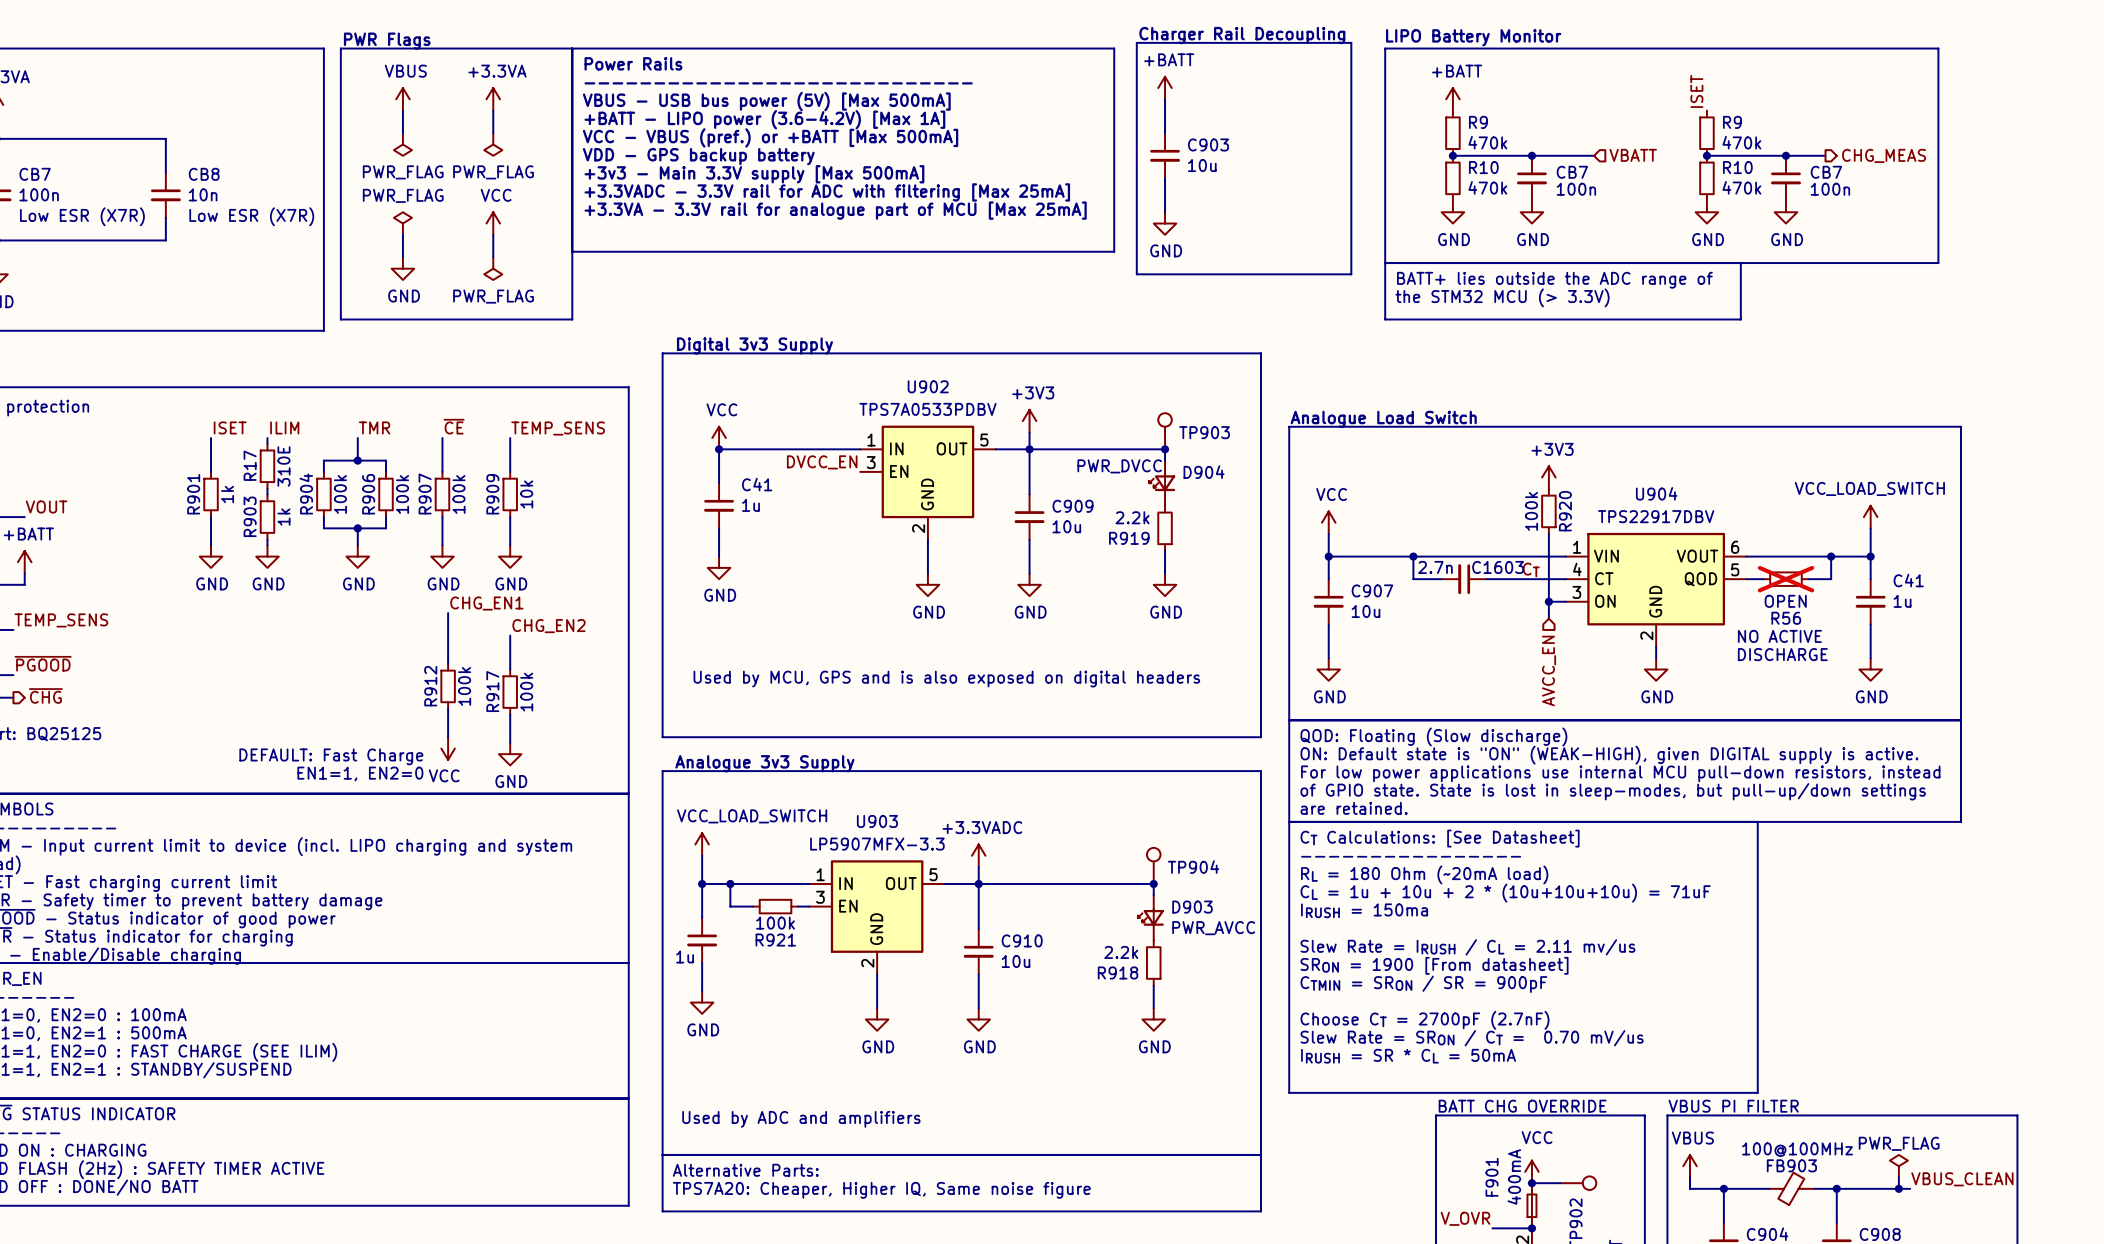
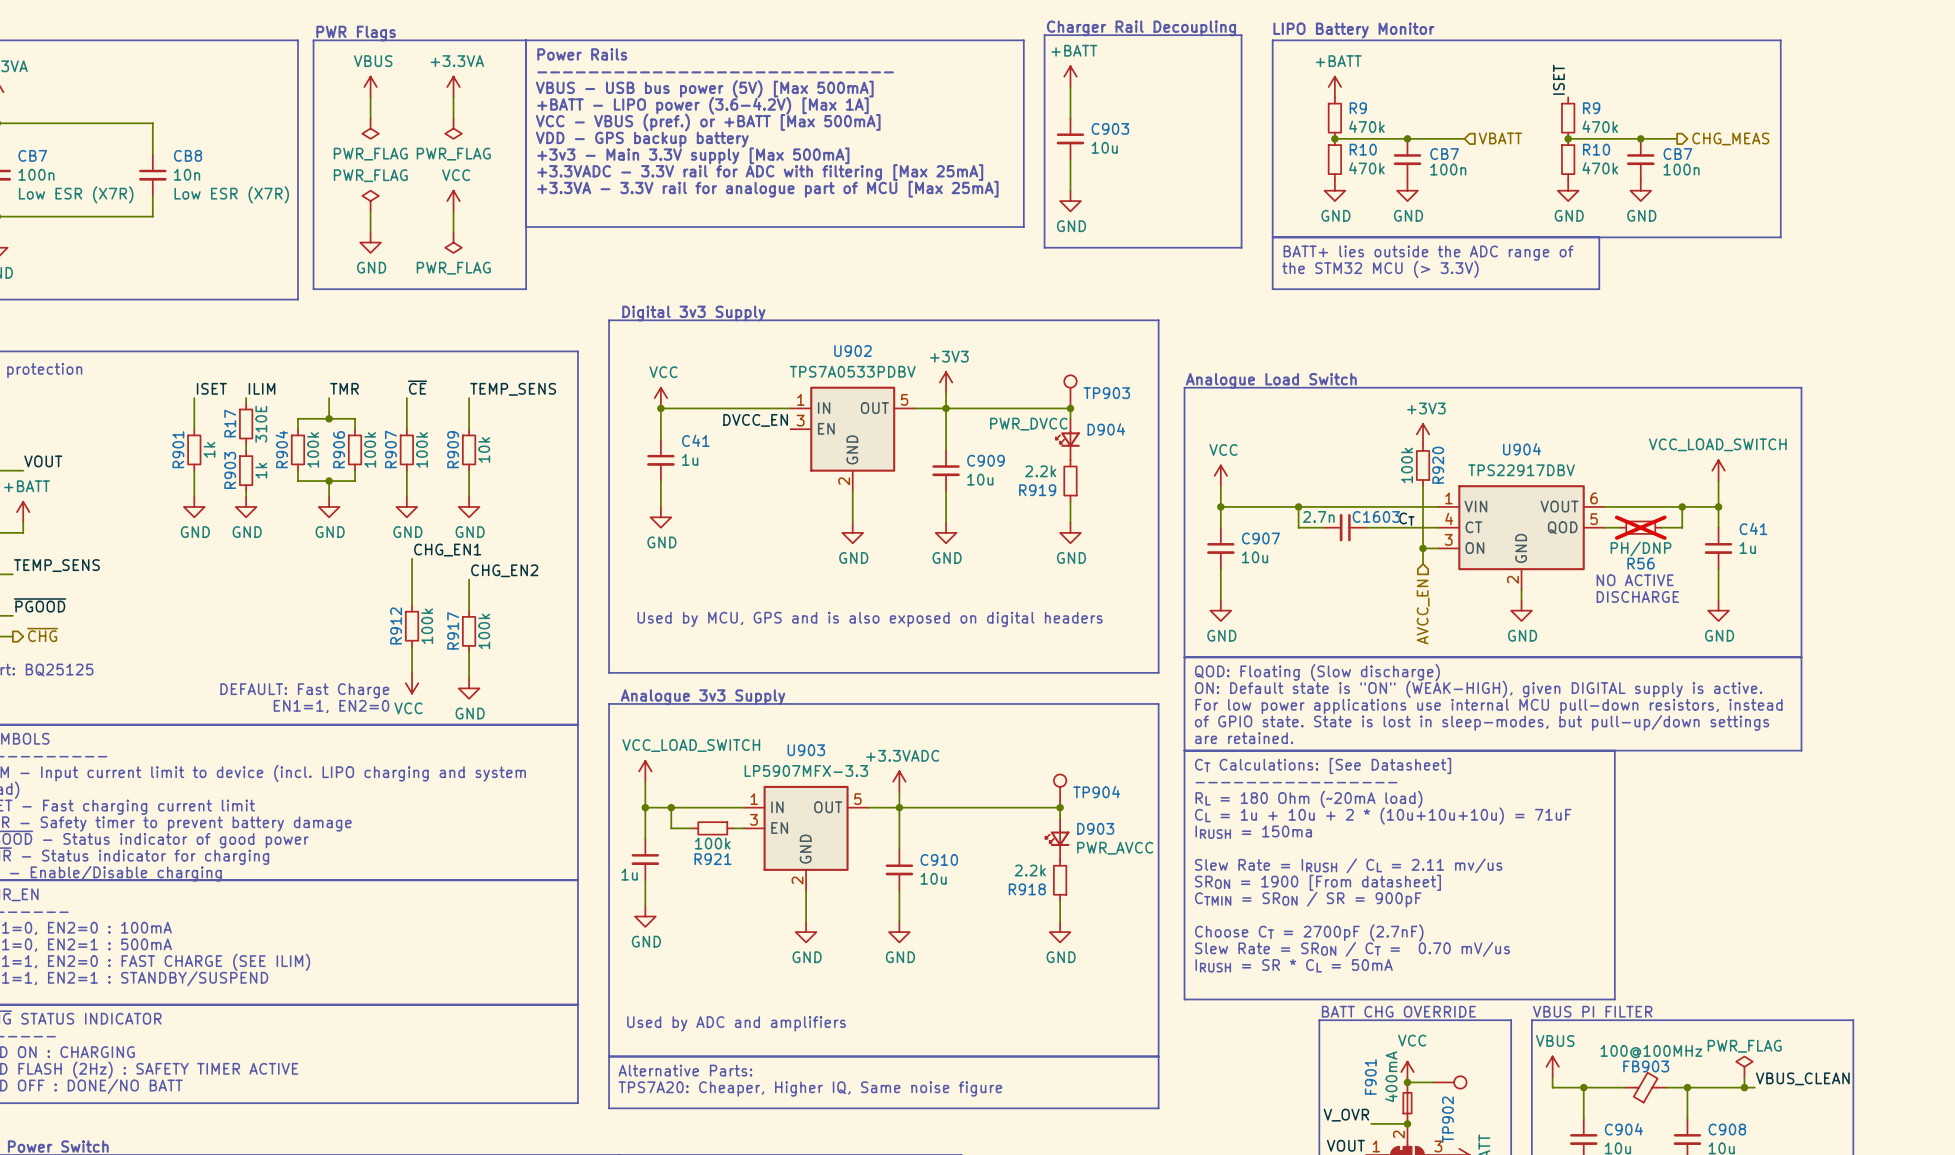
R56 value: OPEN (1785, 601) -> PH/DNP (1641, 549)

